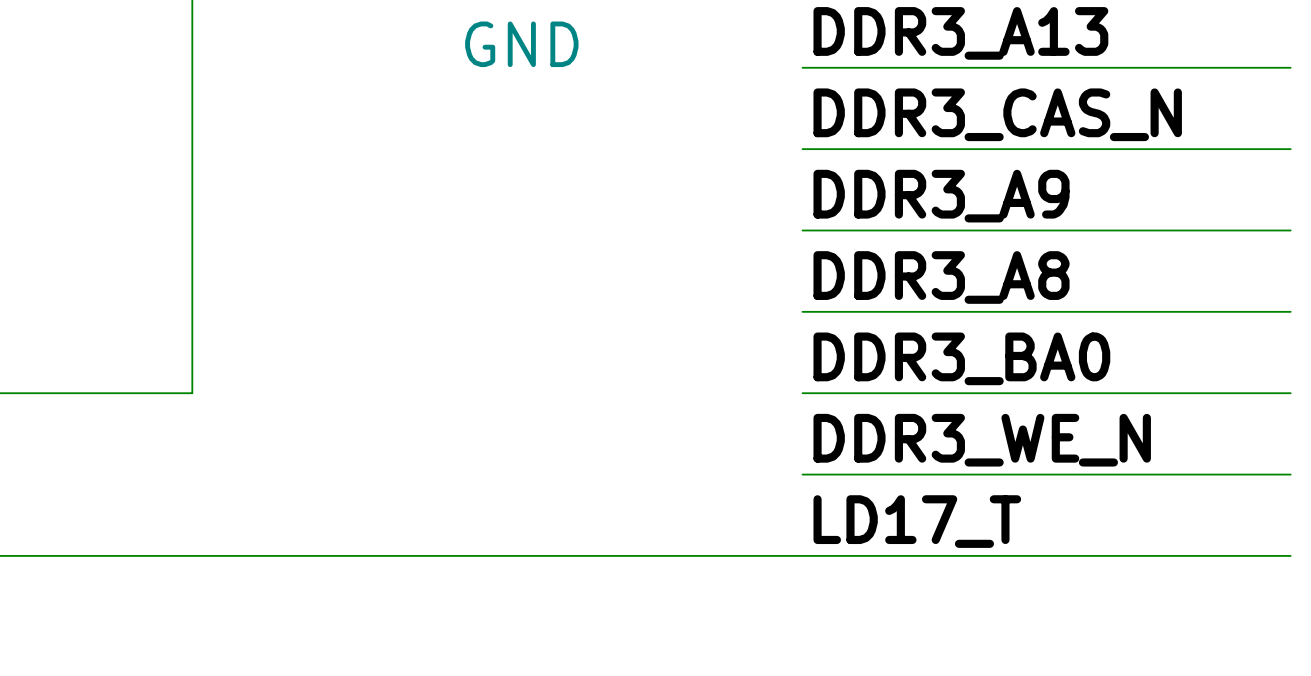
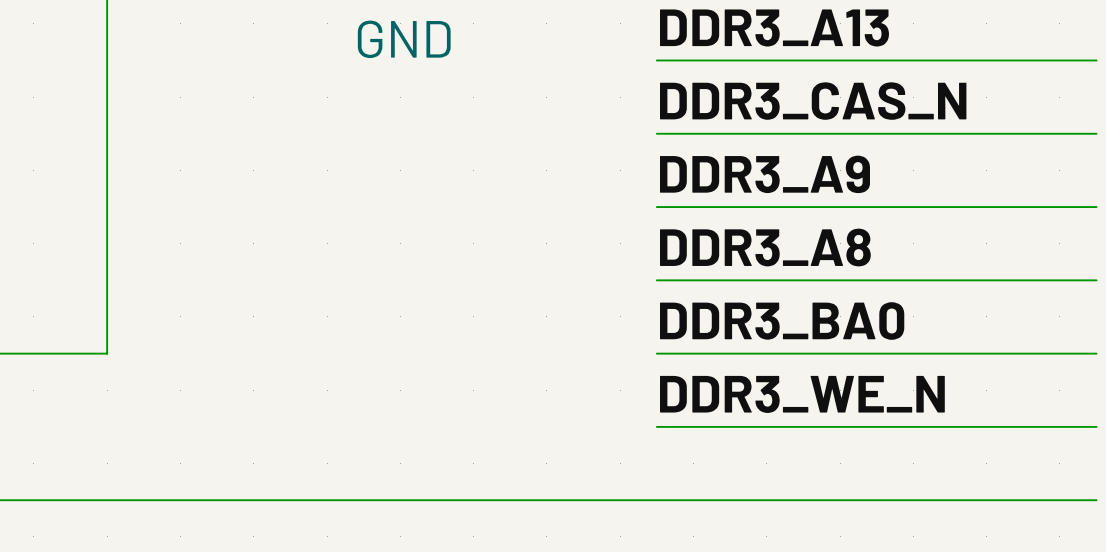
label: LD17_T (917, 521) -> none

